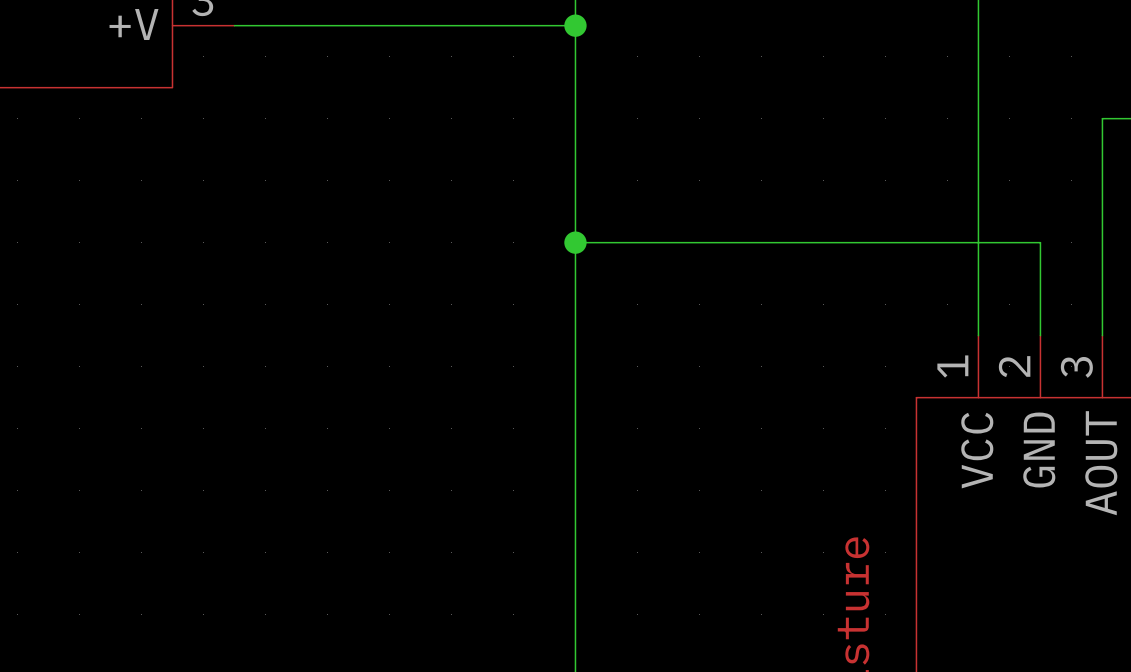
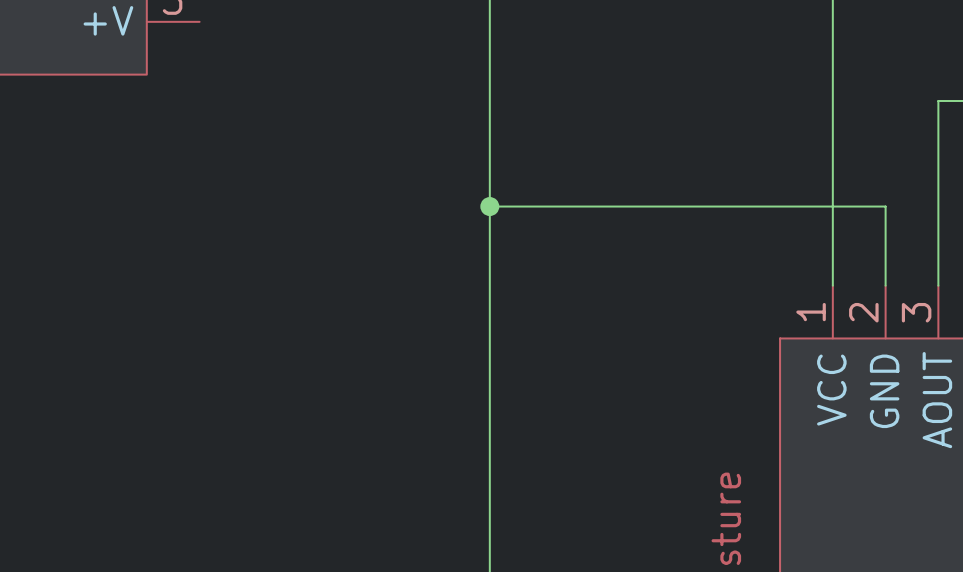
wire: (234, 25) (575, 25) -> none
junction: (575, 25) -> none

